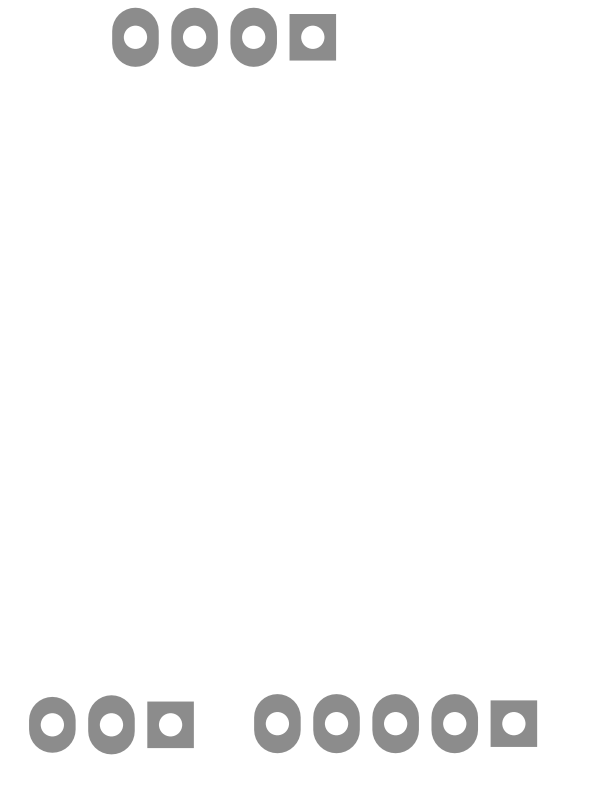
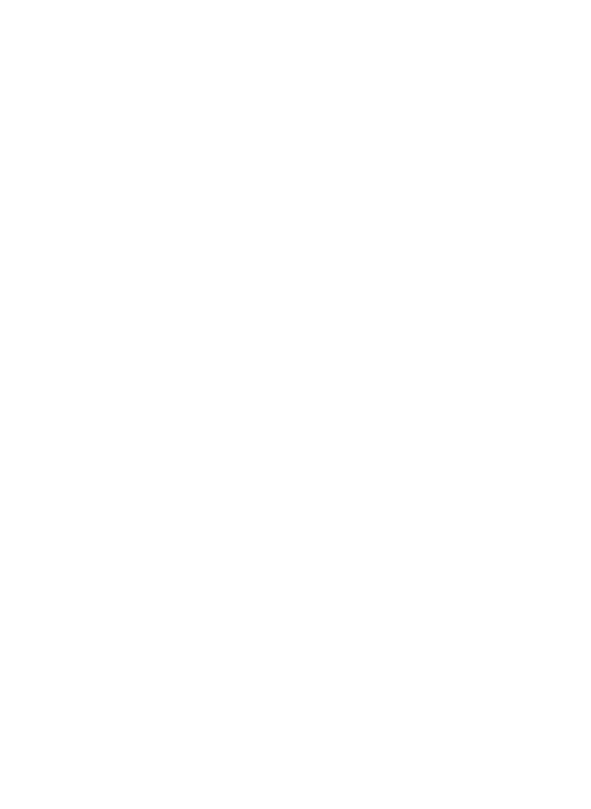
part: (224, 37) -> none
part: (395, 723) -> none
part: (111, 724) -> none

